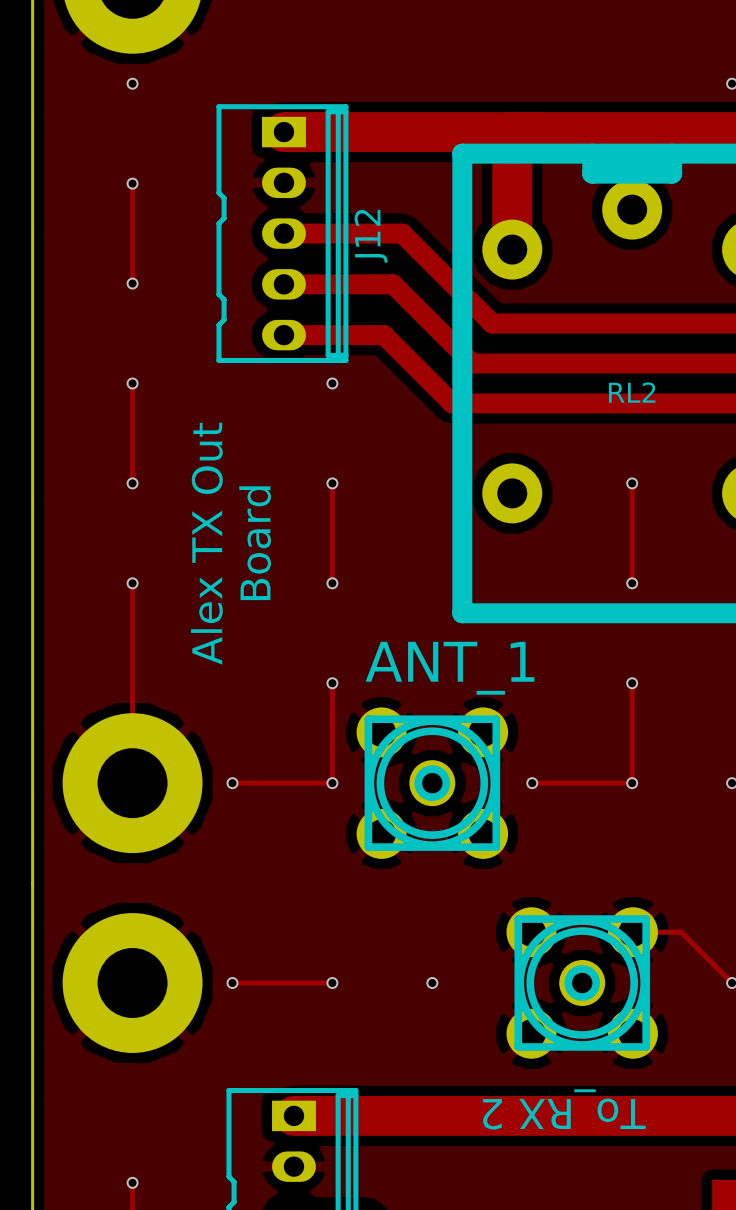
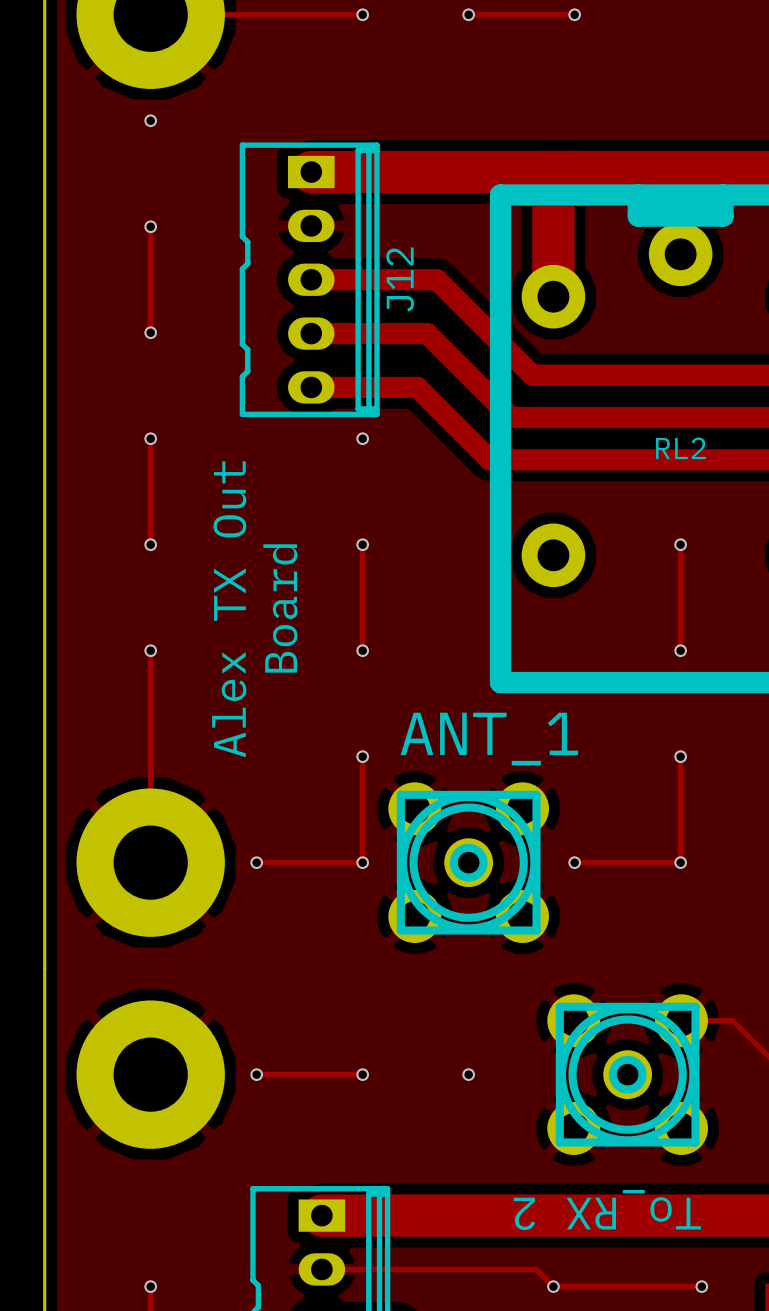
track: none -> (321, 1269) (536, 1269) (553, 1286) (701, 1286)
via: none -> (553, 1286)
via: none -> (701, 1286)

